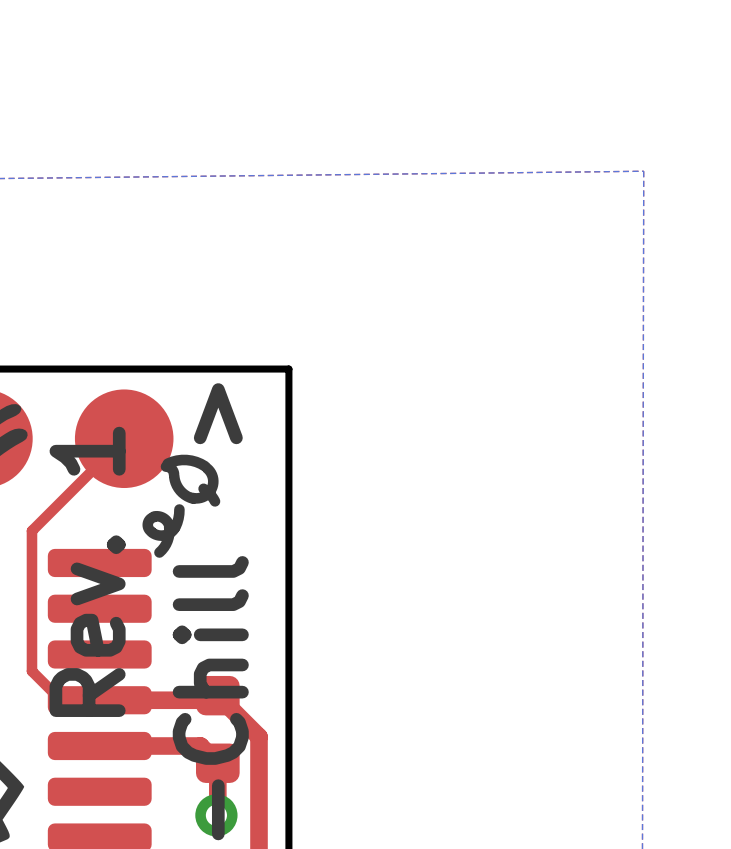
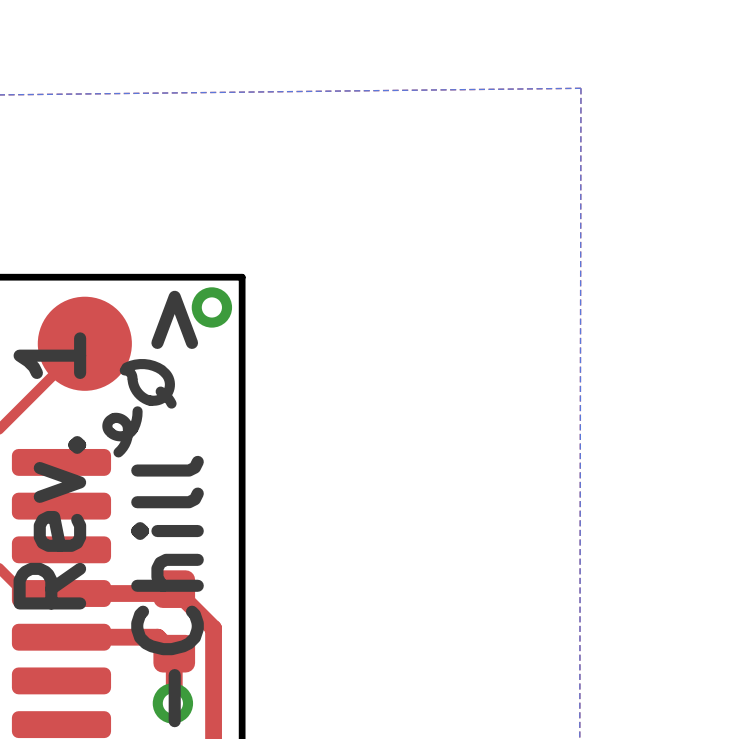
via: none -> (211, 307)

